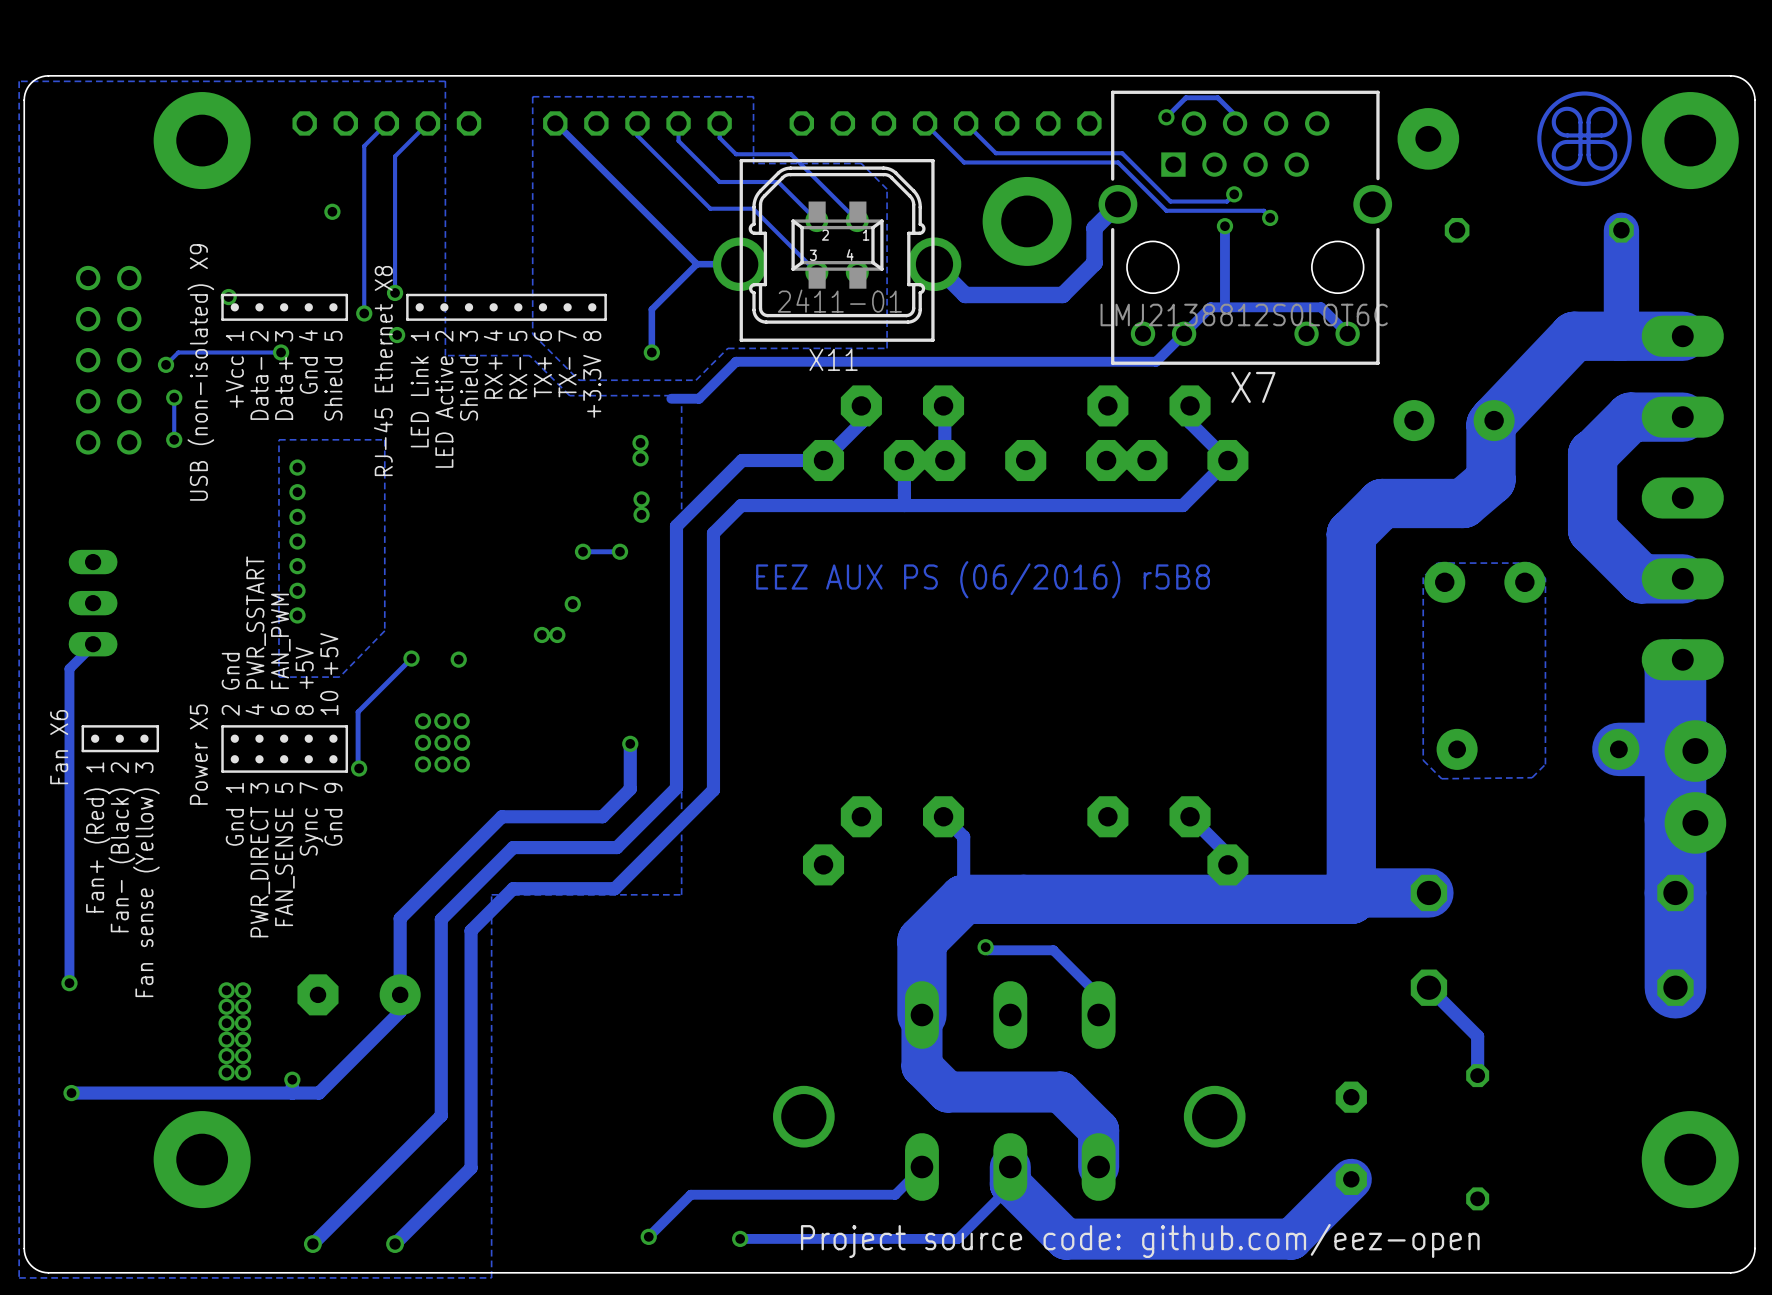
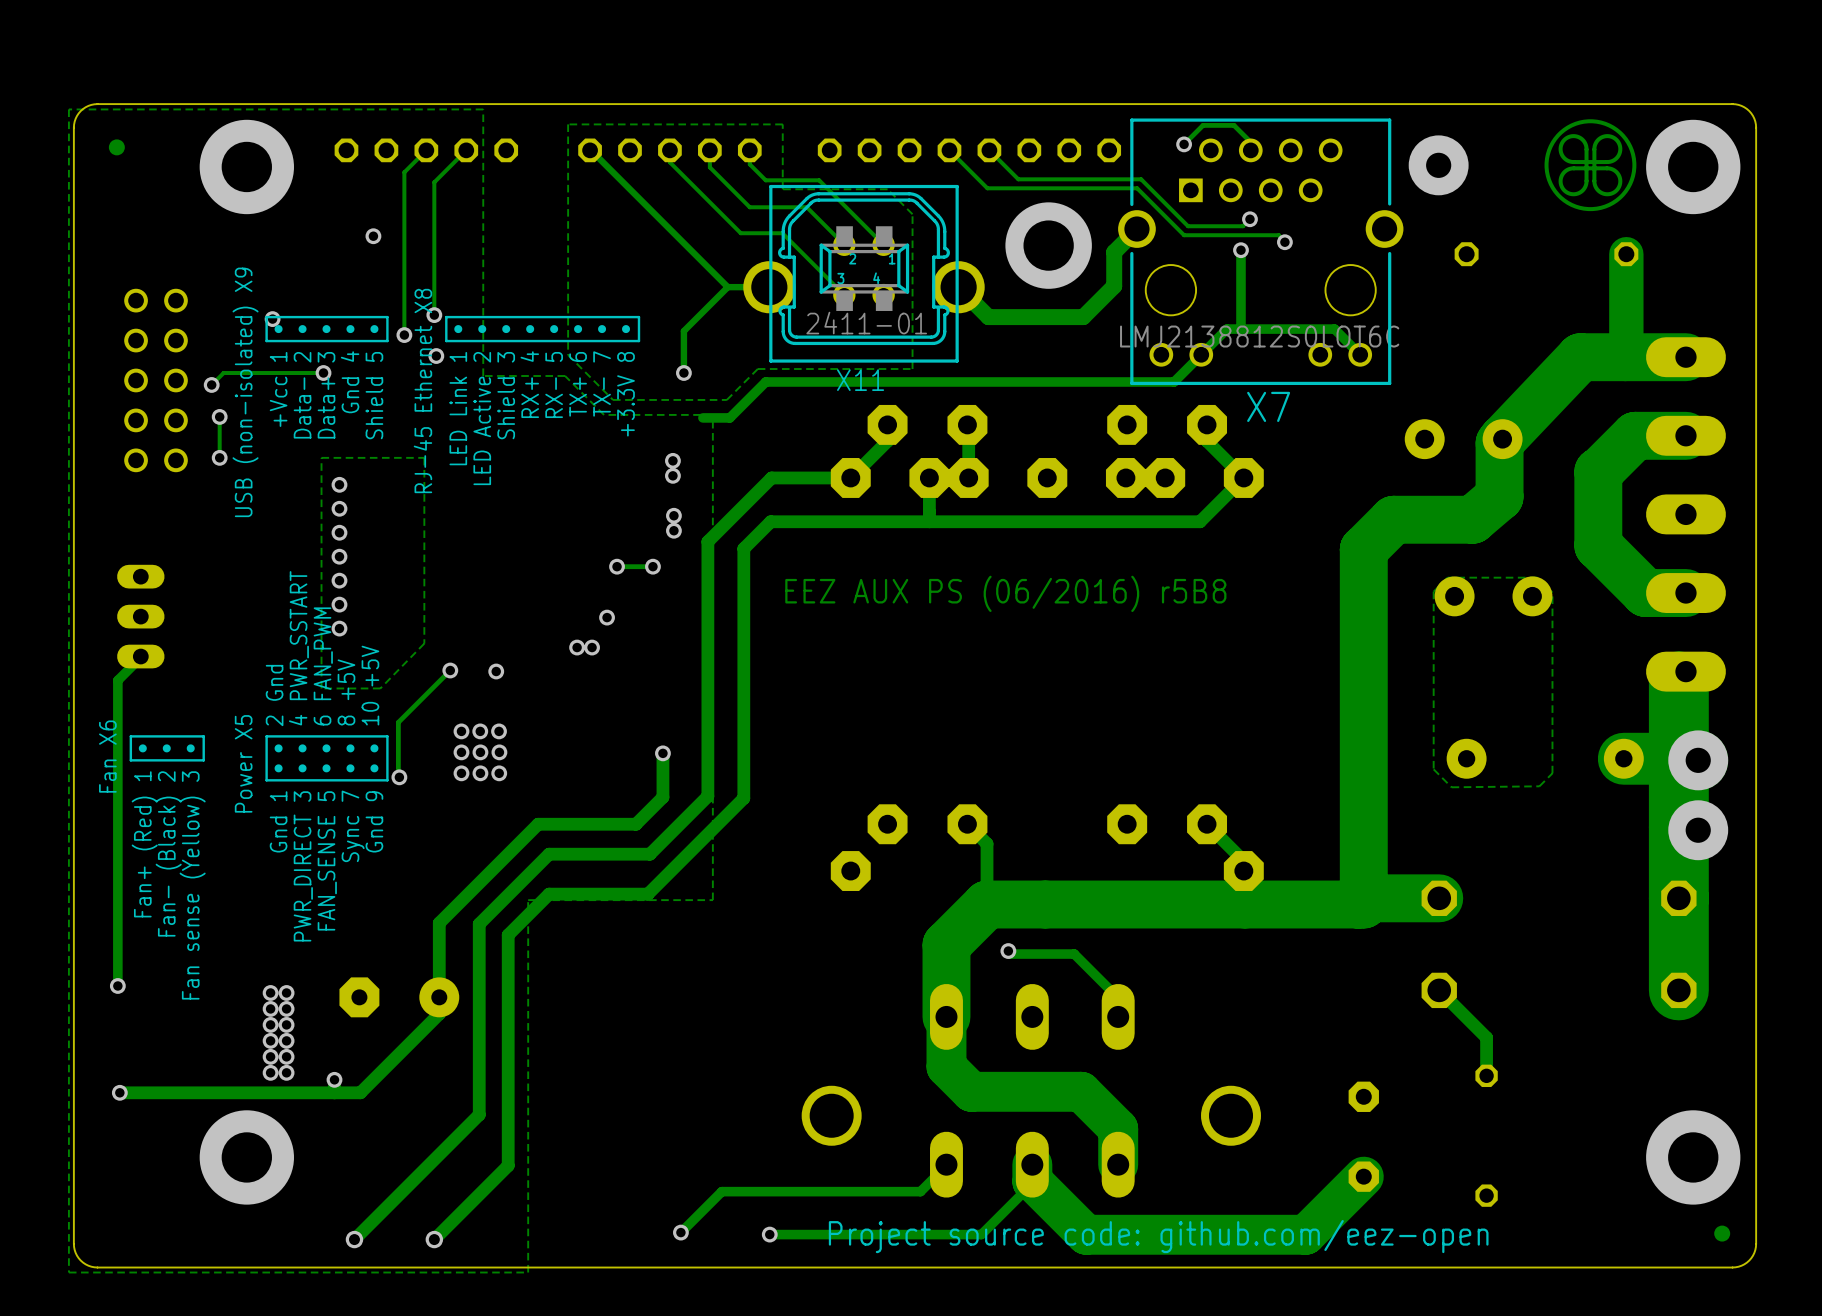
part: none -> (116, 147)
part: none -> (1722, 1233)

